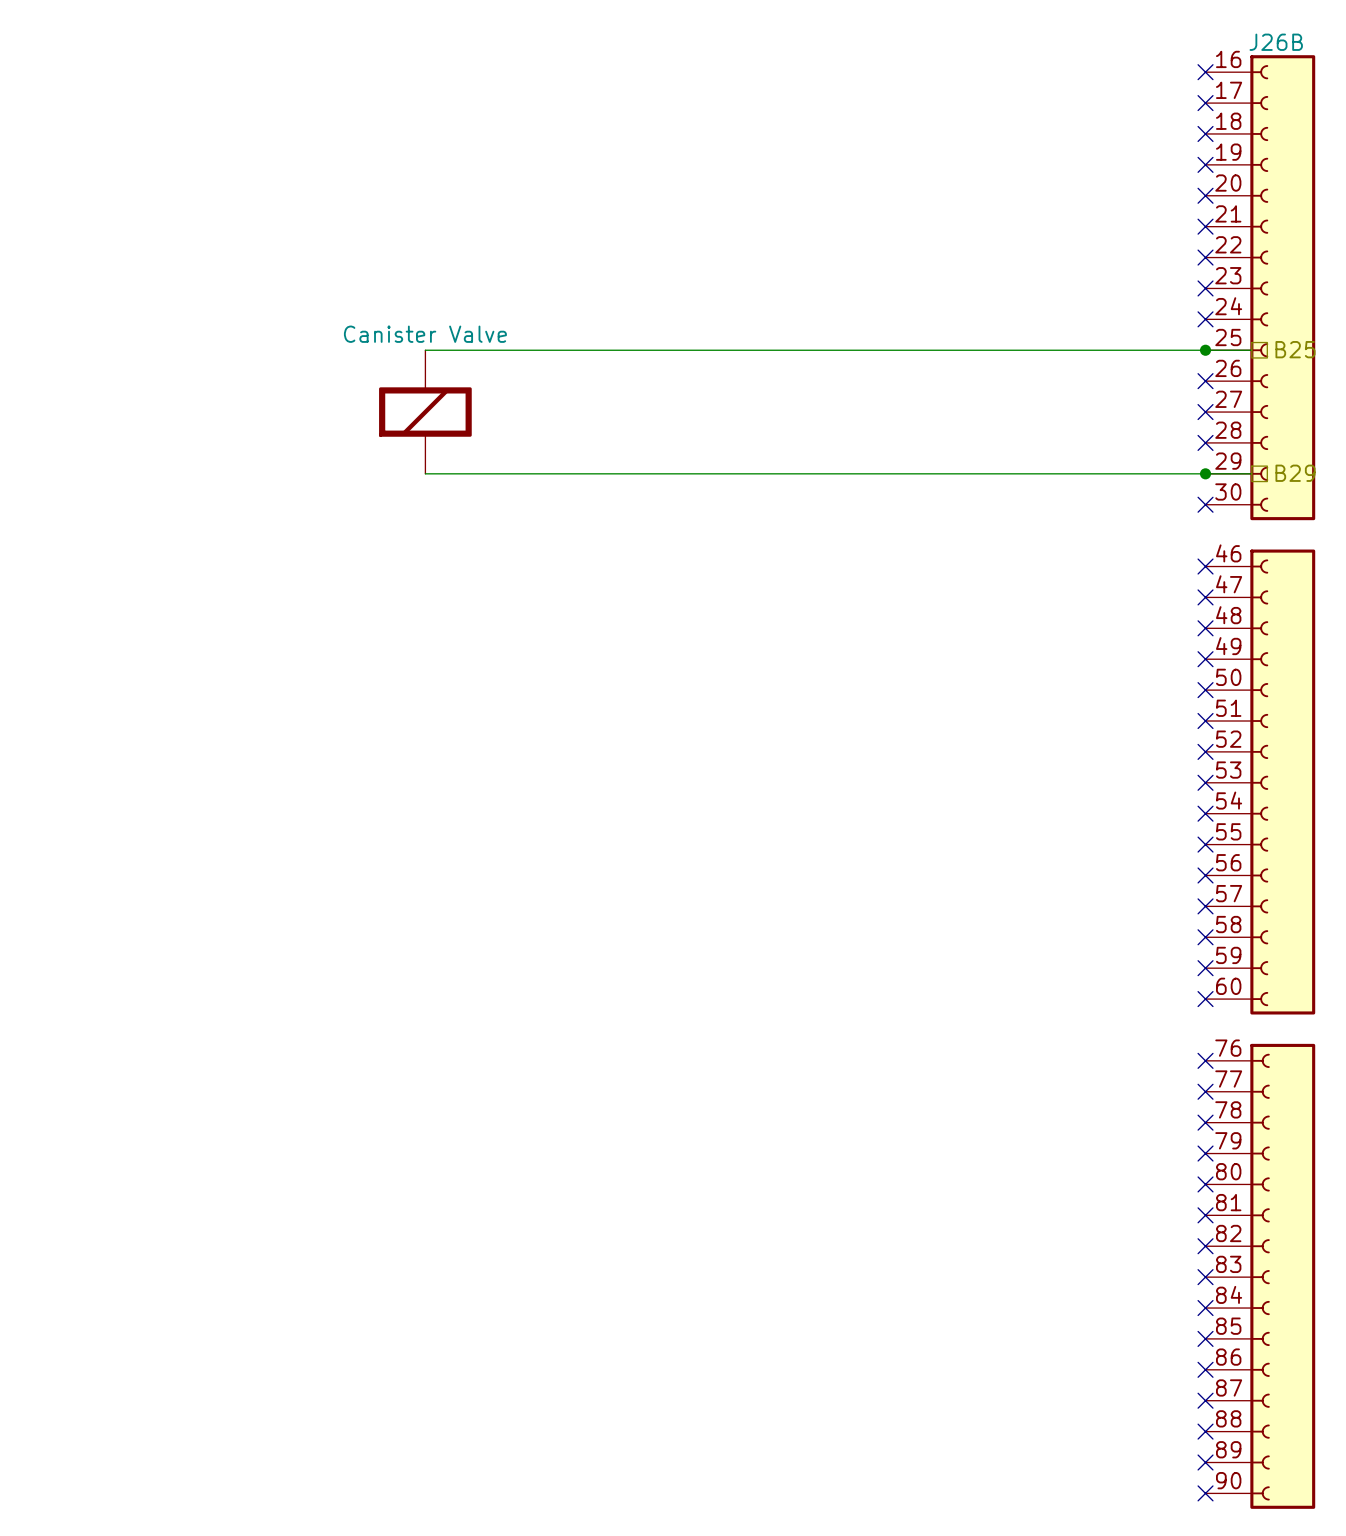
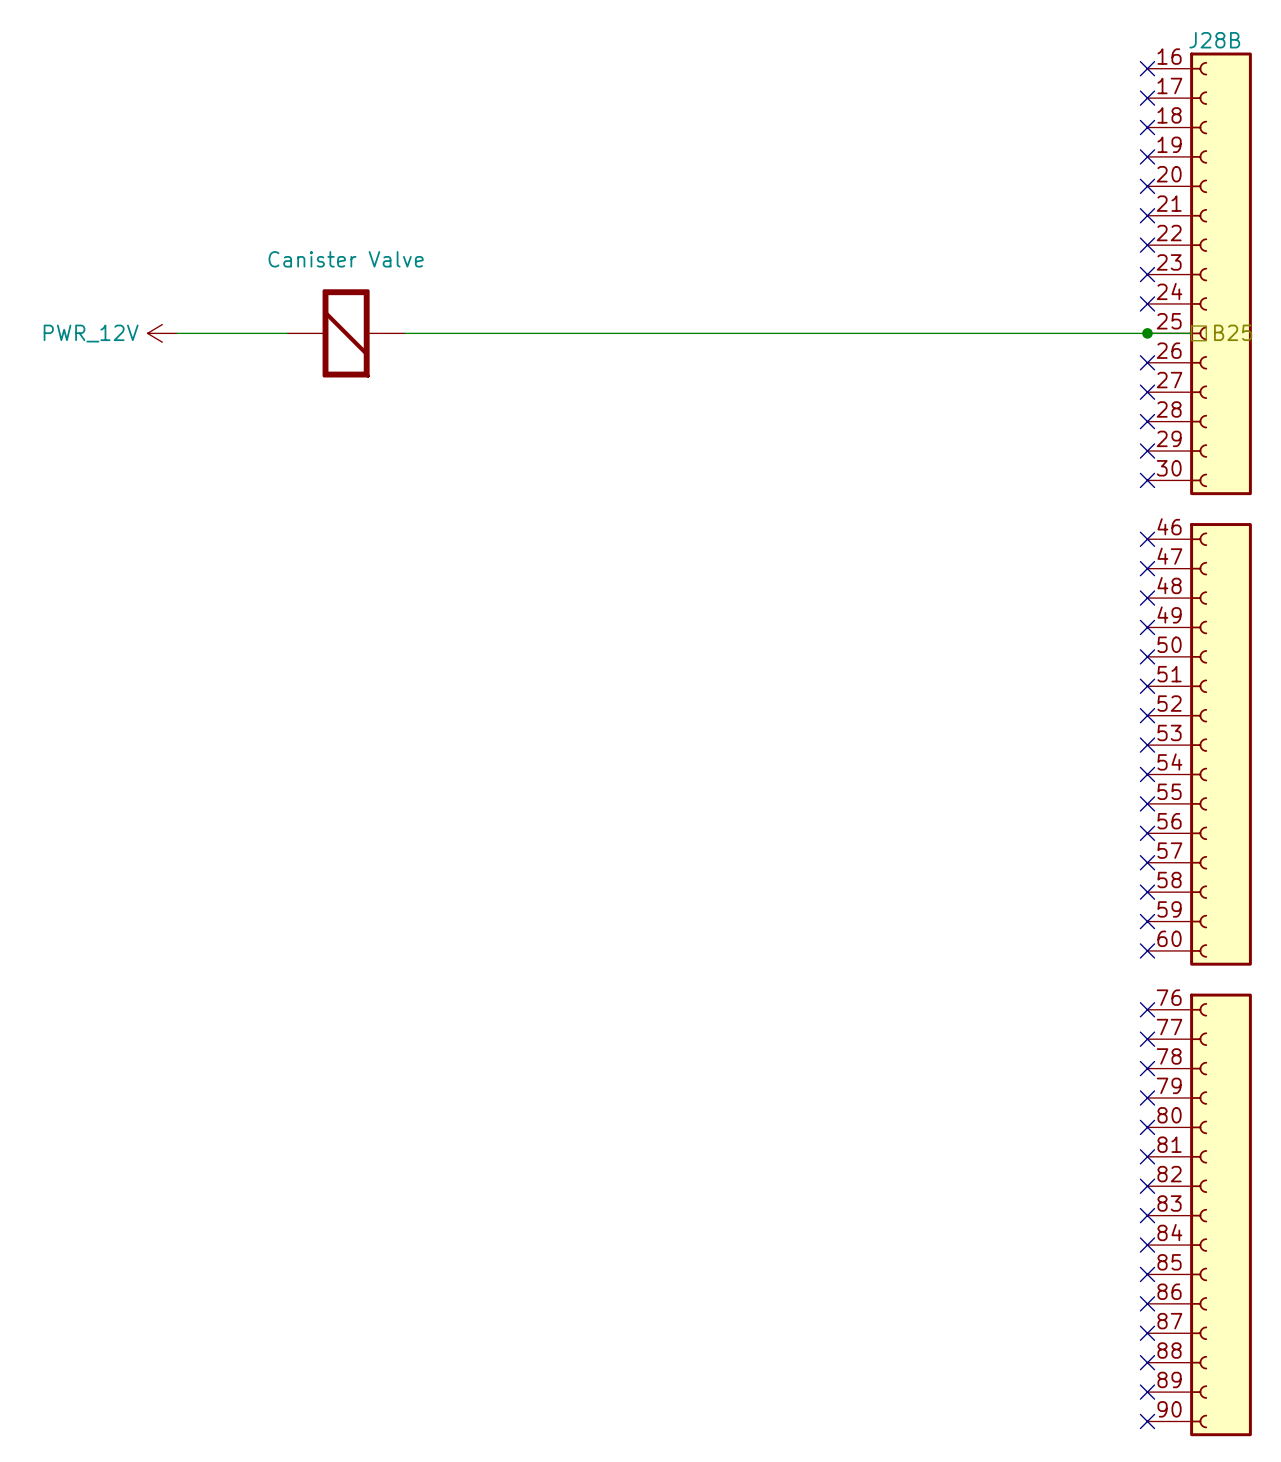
power symbol: none -> PWR_12V (162, 333)
wire: none -> (177, 333) (287, 333)
part rotation: 0° (425, 412) -> 90° counterclockwise (346, 333)
part position: (425, 412) -> (346, 333)
wire: (425, 473) (1251, 473) -> none
junction: (1205, 473) -> none
no-connect mark: none -> (1147, 451)
hierarchical label: B29 (1295, 473) -> none
J26B: (1260, 782) -> none
J28B: none -> (1199, 744)

